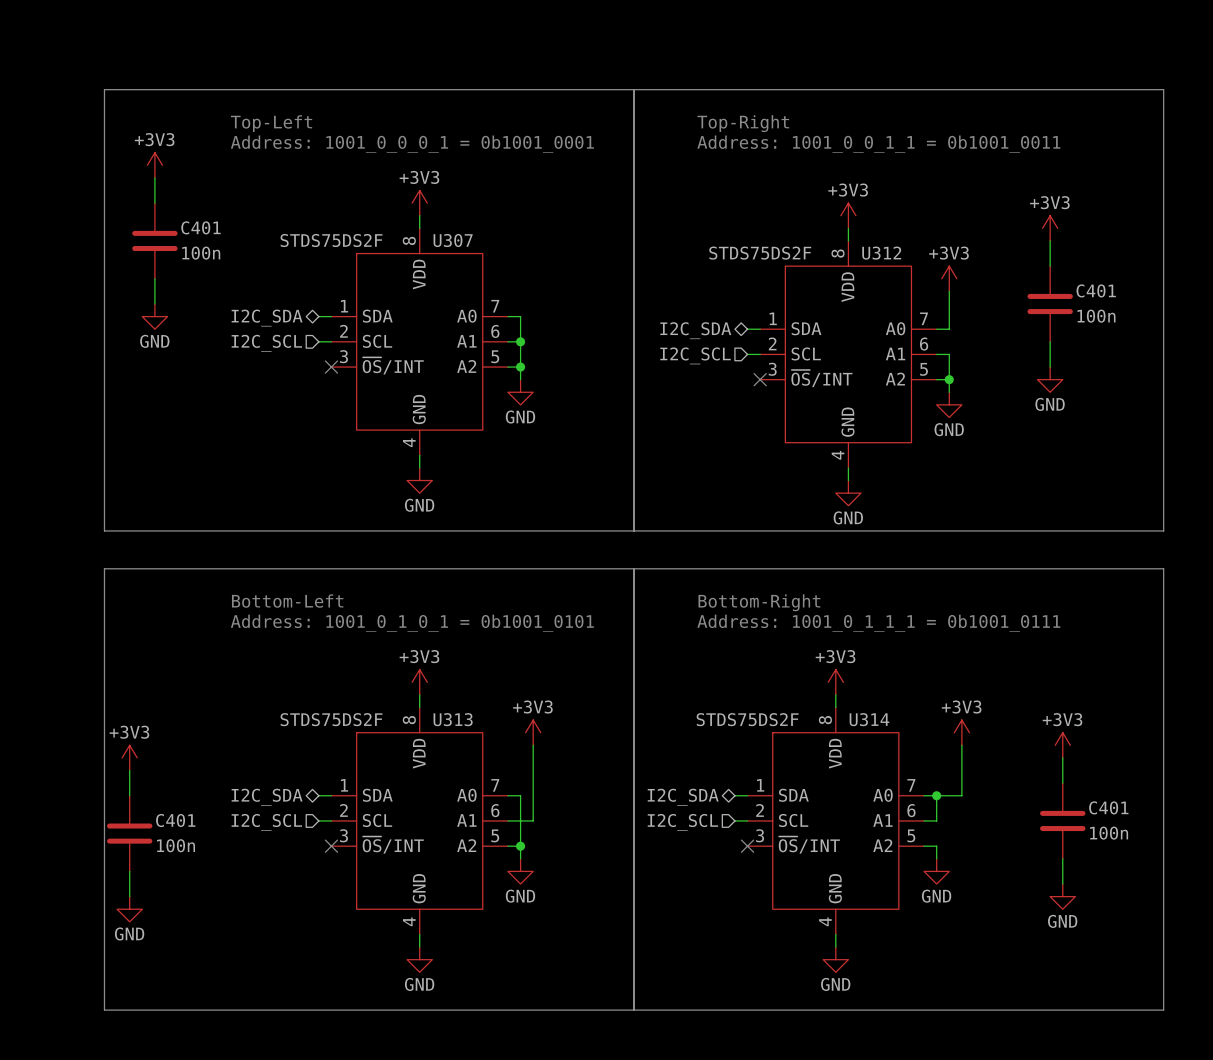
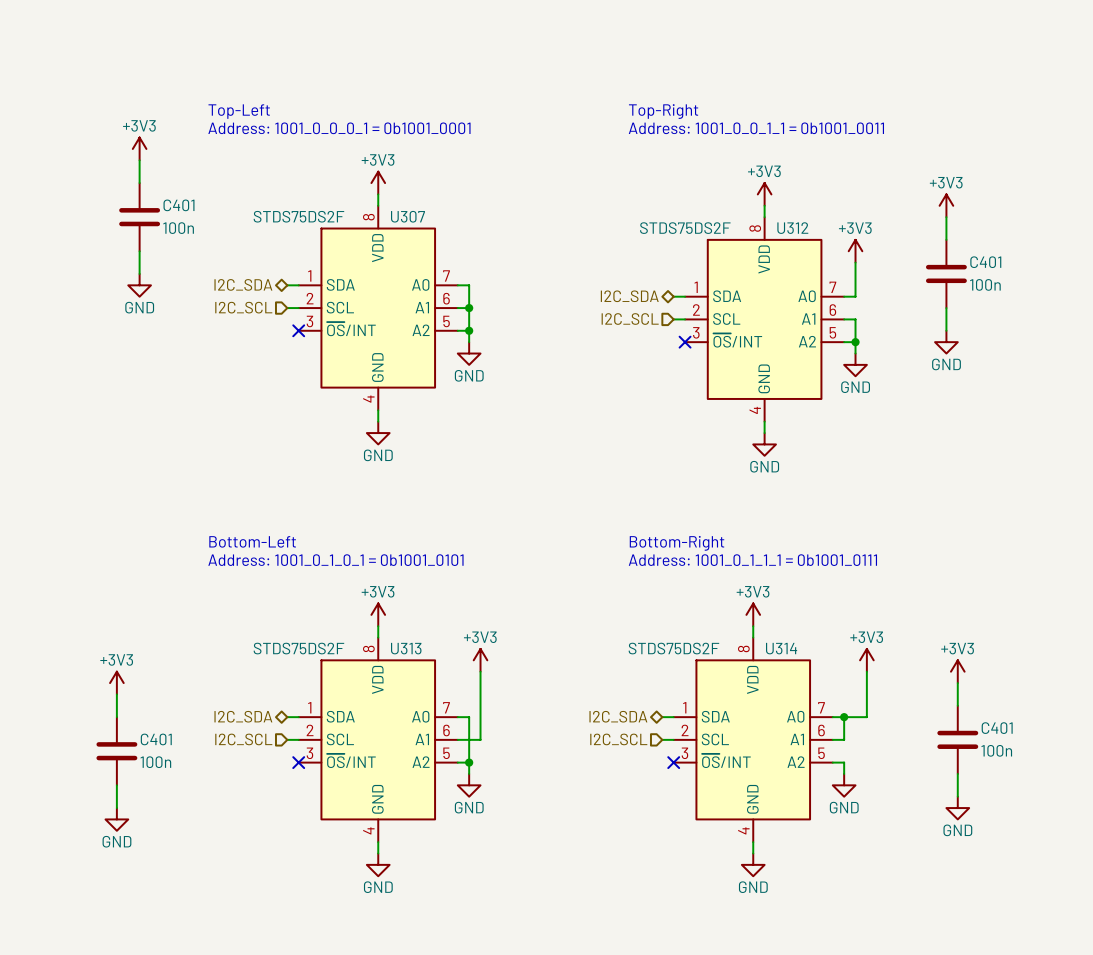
line: (104, 89) (104, 530) (1163, 530) (1163, 89) (104, 89) -> none
line: (634, 89) (634, 530) -> none
line: (104, 568) (1163, 568) (1163, 1010) (104, 1010) (104, 568) -> none
line: (634, 568) (634, 1010) -> none

